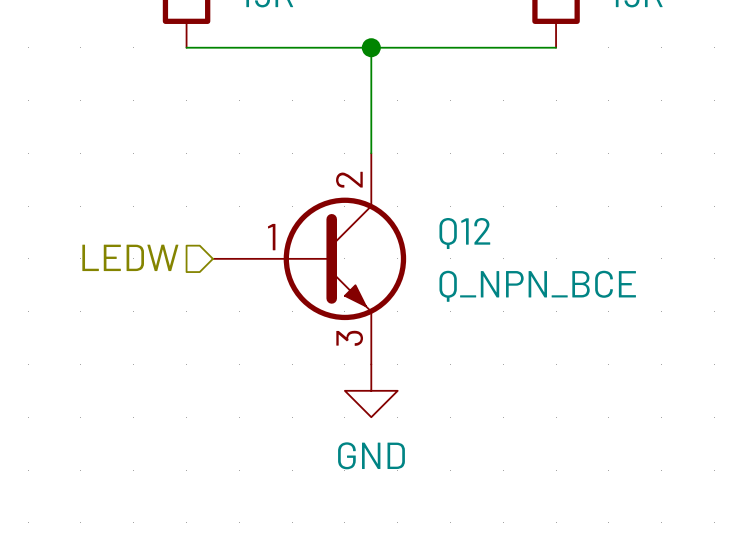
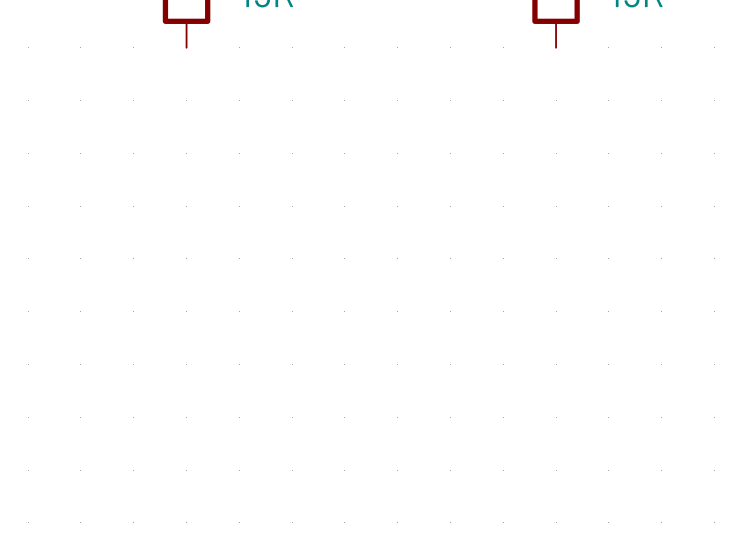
wire: (186, 47) (556, 47) -> none
wire: (371, 47) (371, 153) -> none
junction: (371, 47) -> none
hierarchical label: LEDW (130, 257) -> none
Q12: Q_NPN_BCE (309, 258) -> none
power symbol: GND (371, 390) -> none

